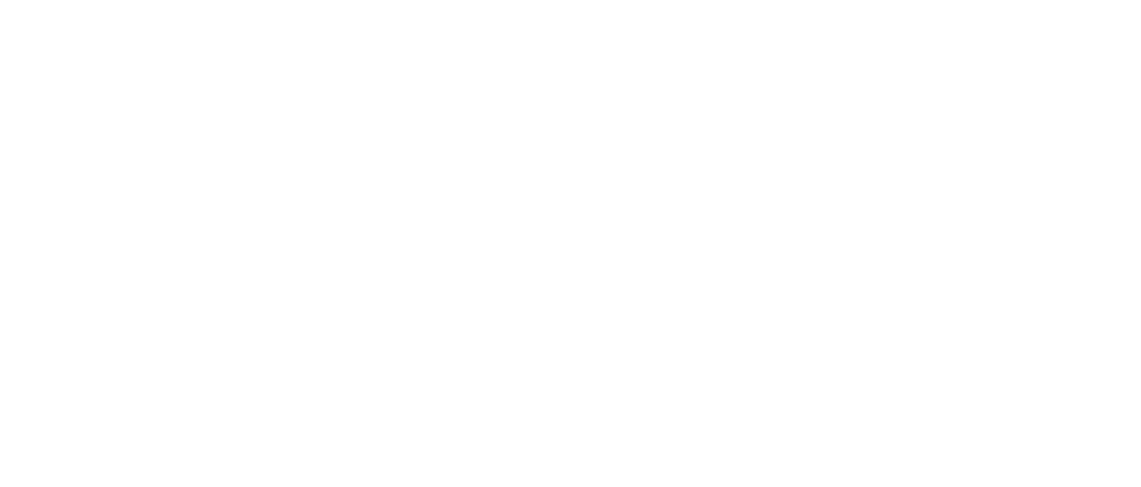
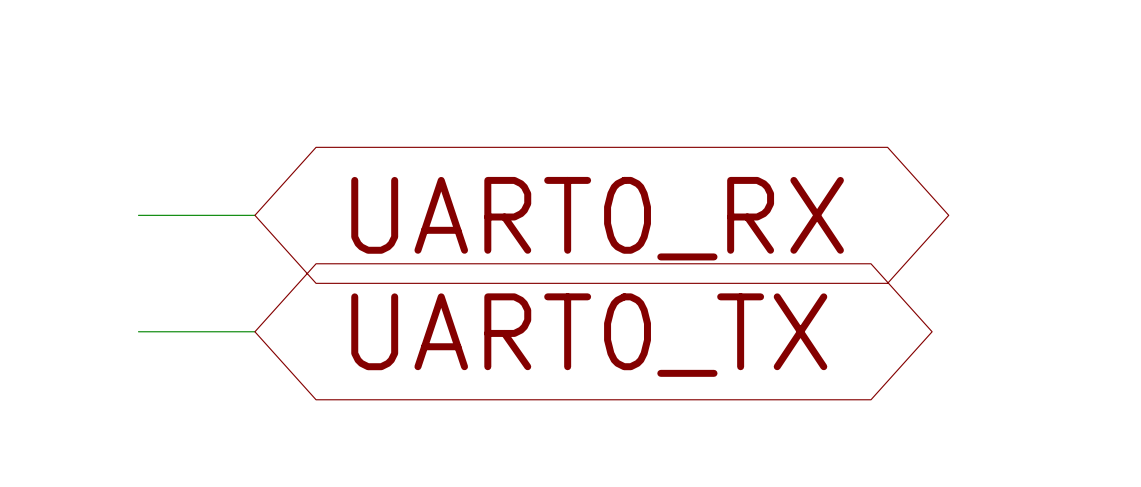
wire: none -> (138, 215) (254, 215)
global label: none -> UART0_RX (597, 218)
wire: none -> (138, 331) (254, 331)
global label: none -> UART0_TX (589, 335)

